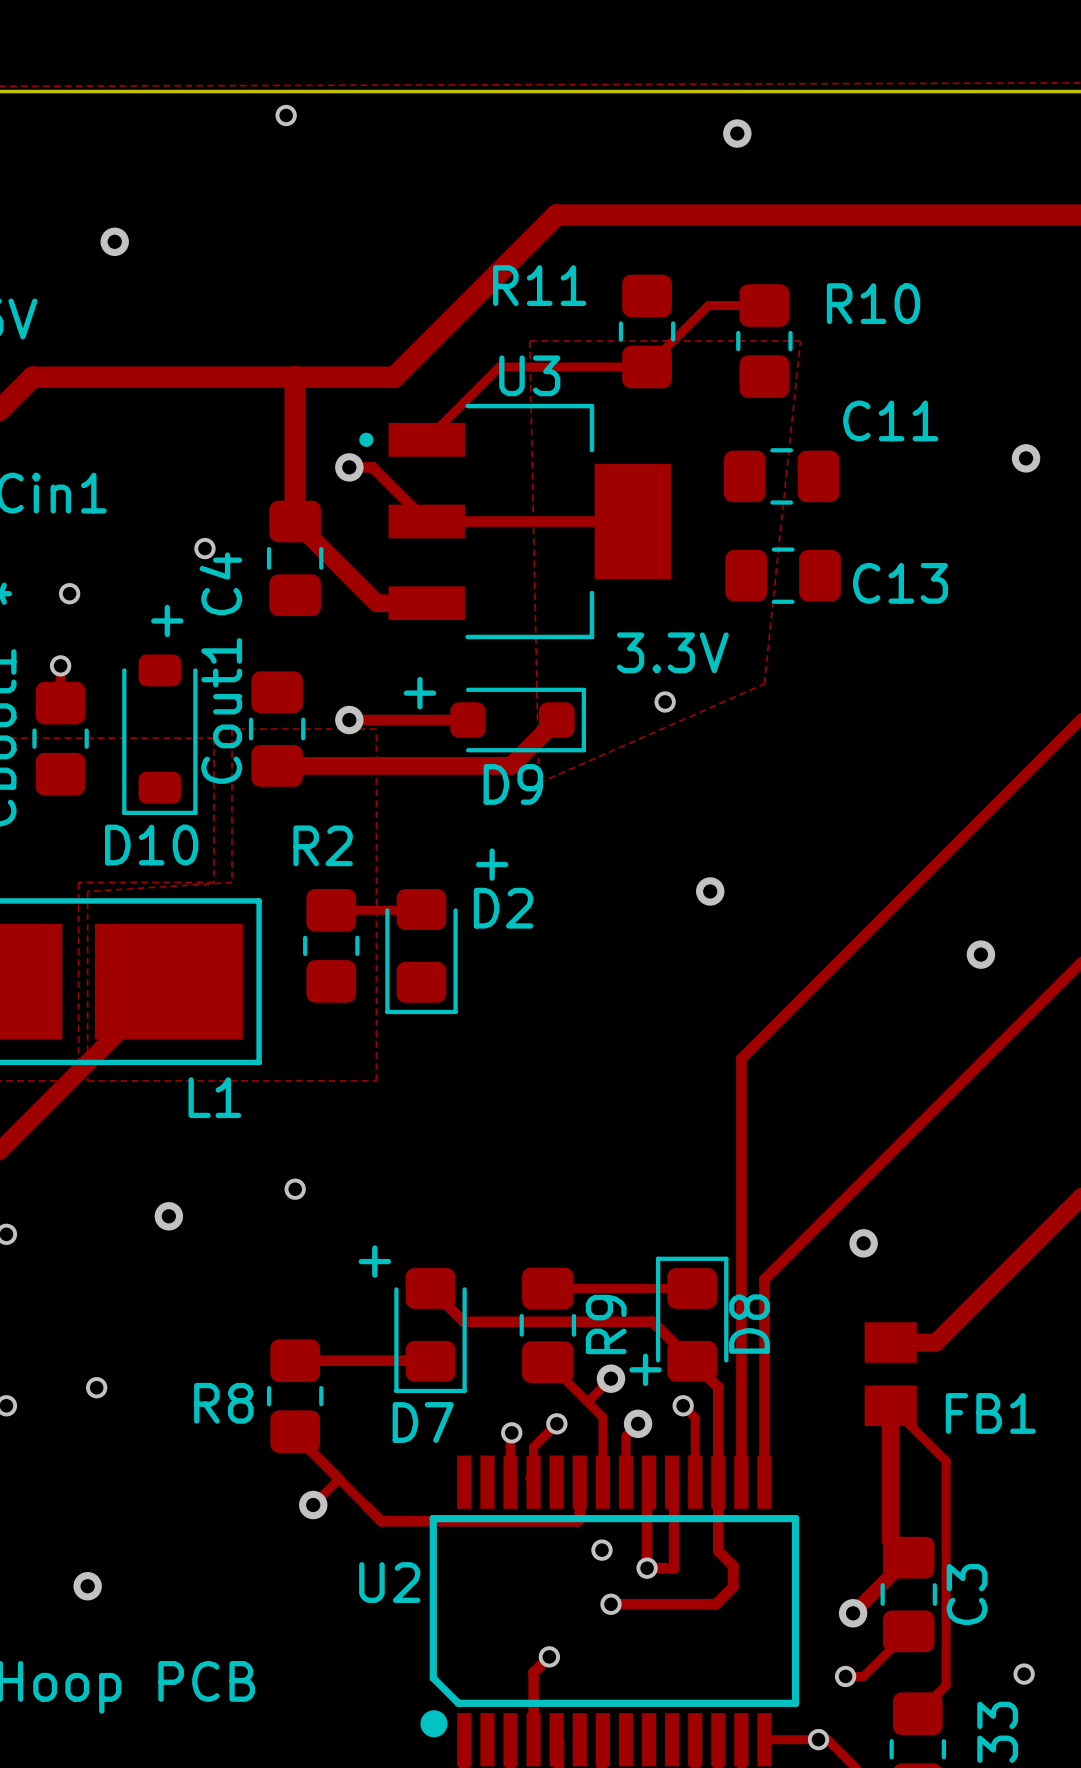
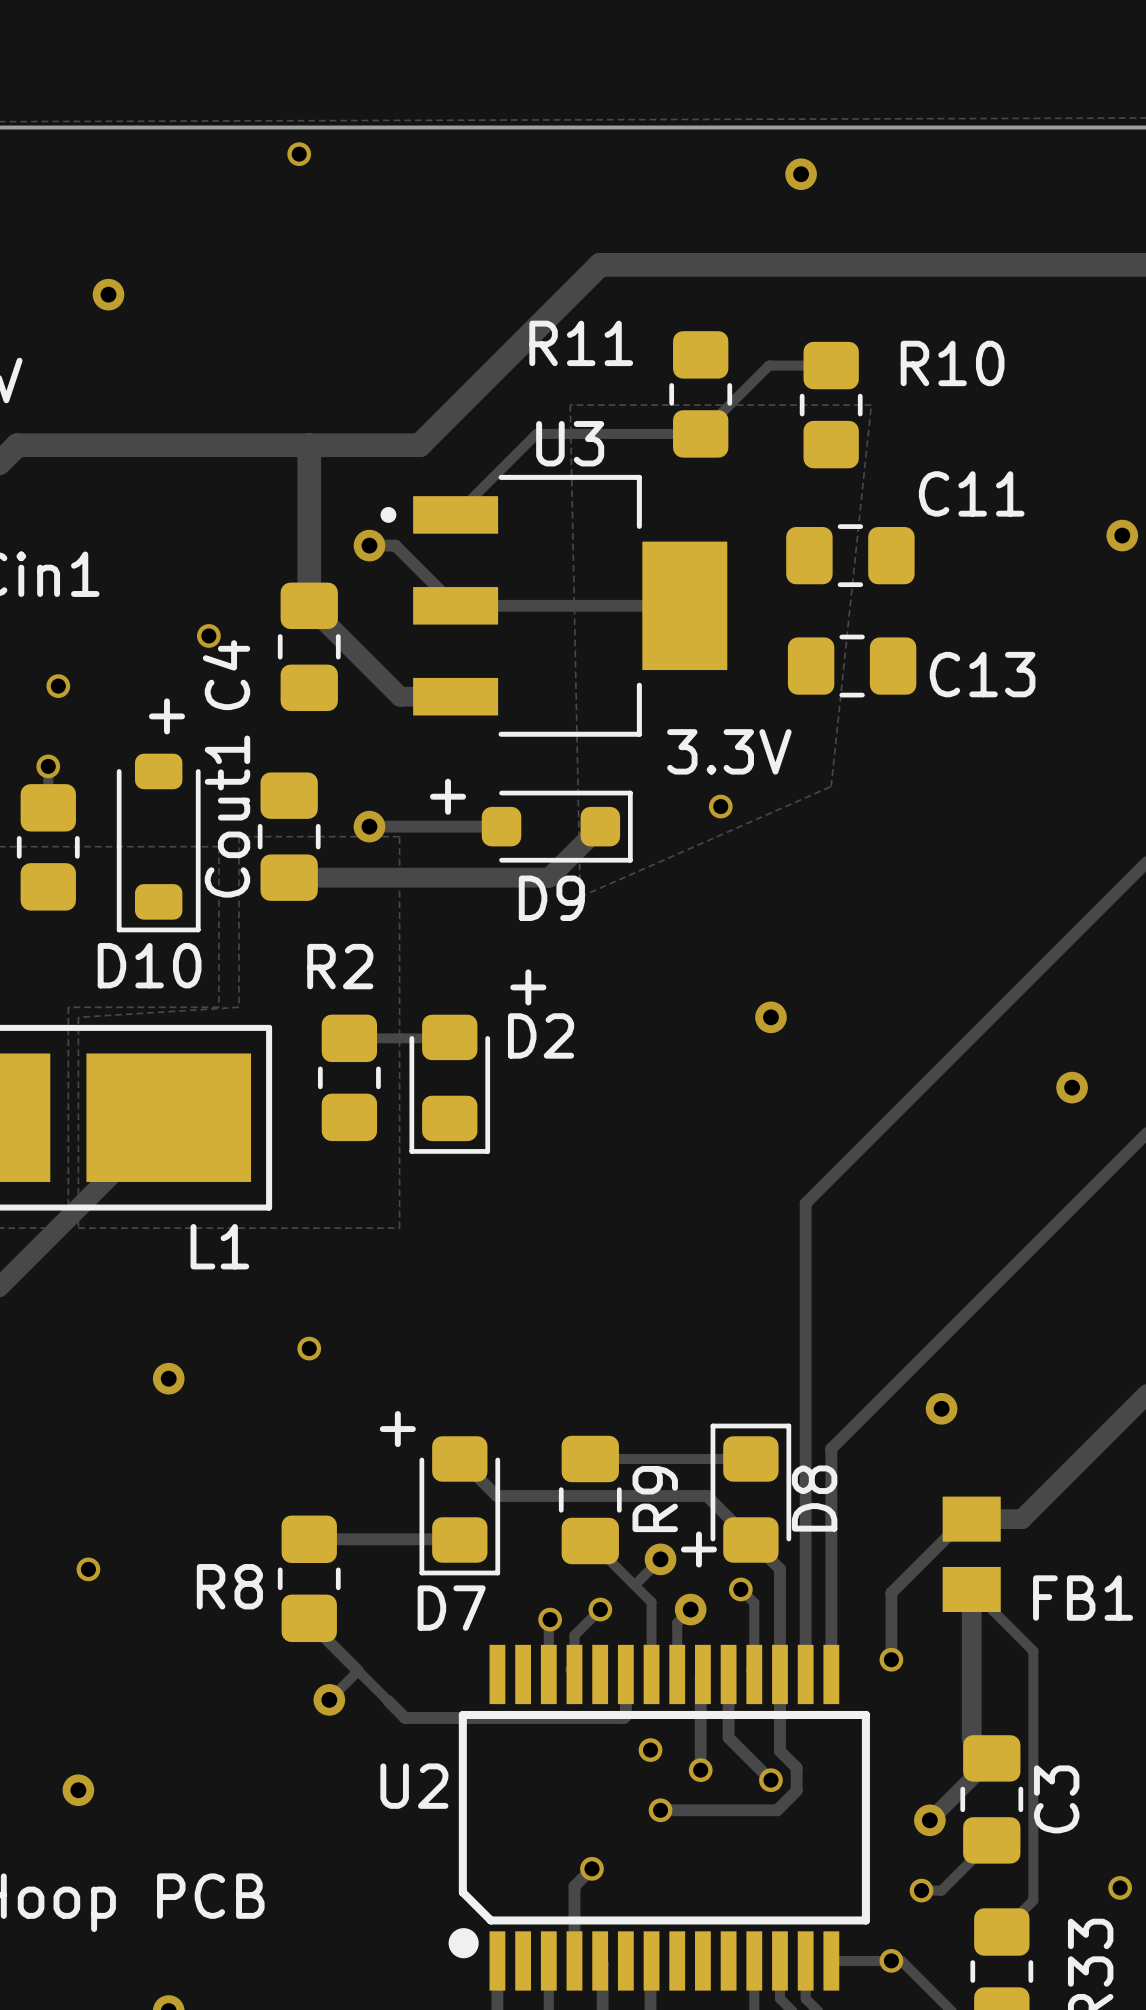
track: none -> (965, 1519) (891, 1592) (891, 1659)
via: none -> (891, 1659)
track: (672, 1482) (674, 1484) (674, 1568) (647, 1568) -> (728, 1674) (728, 1737) (770, 1780)
via: none -> (770, 1780)

